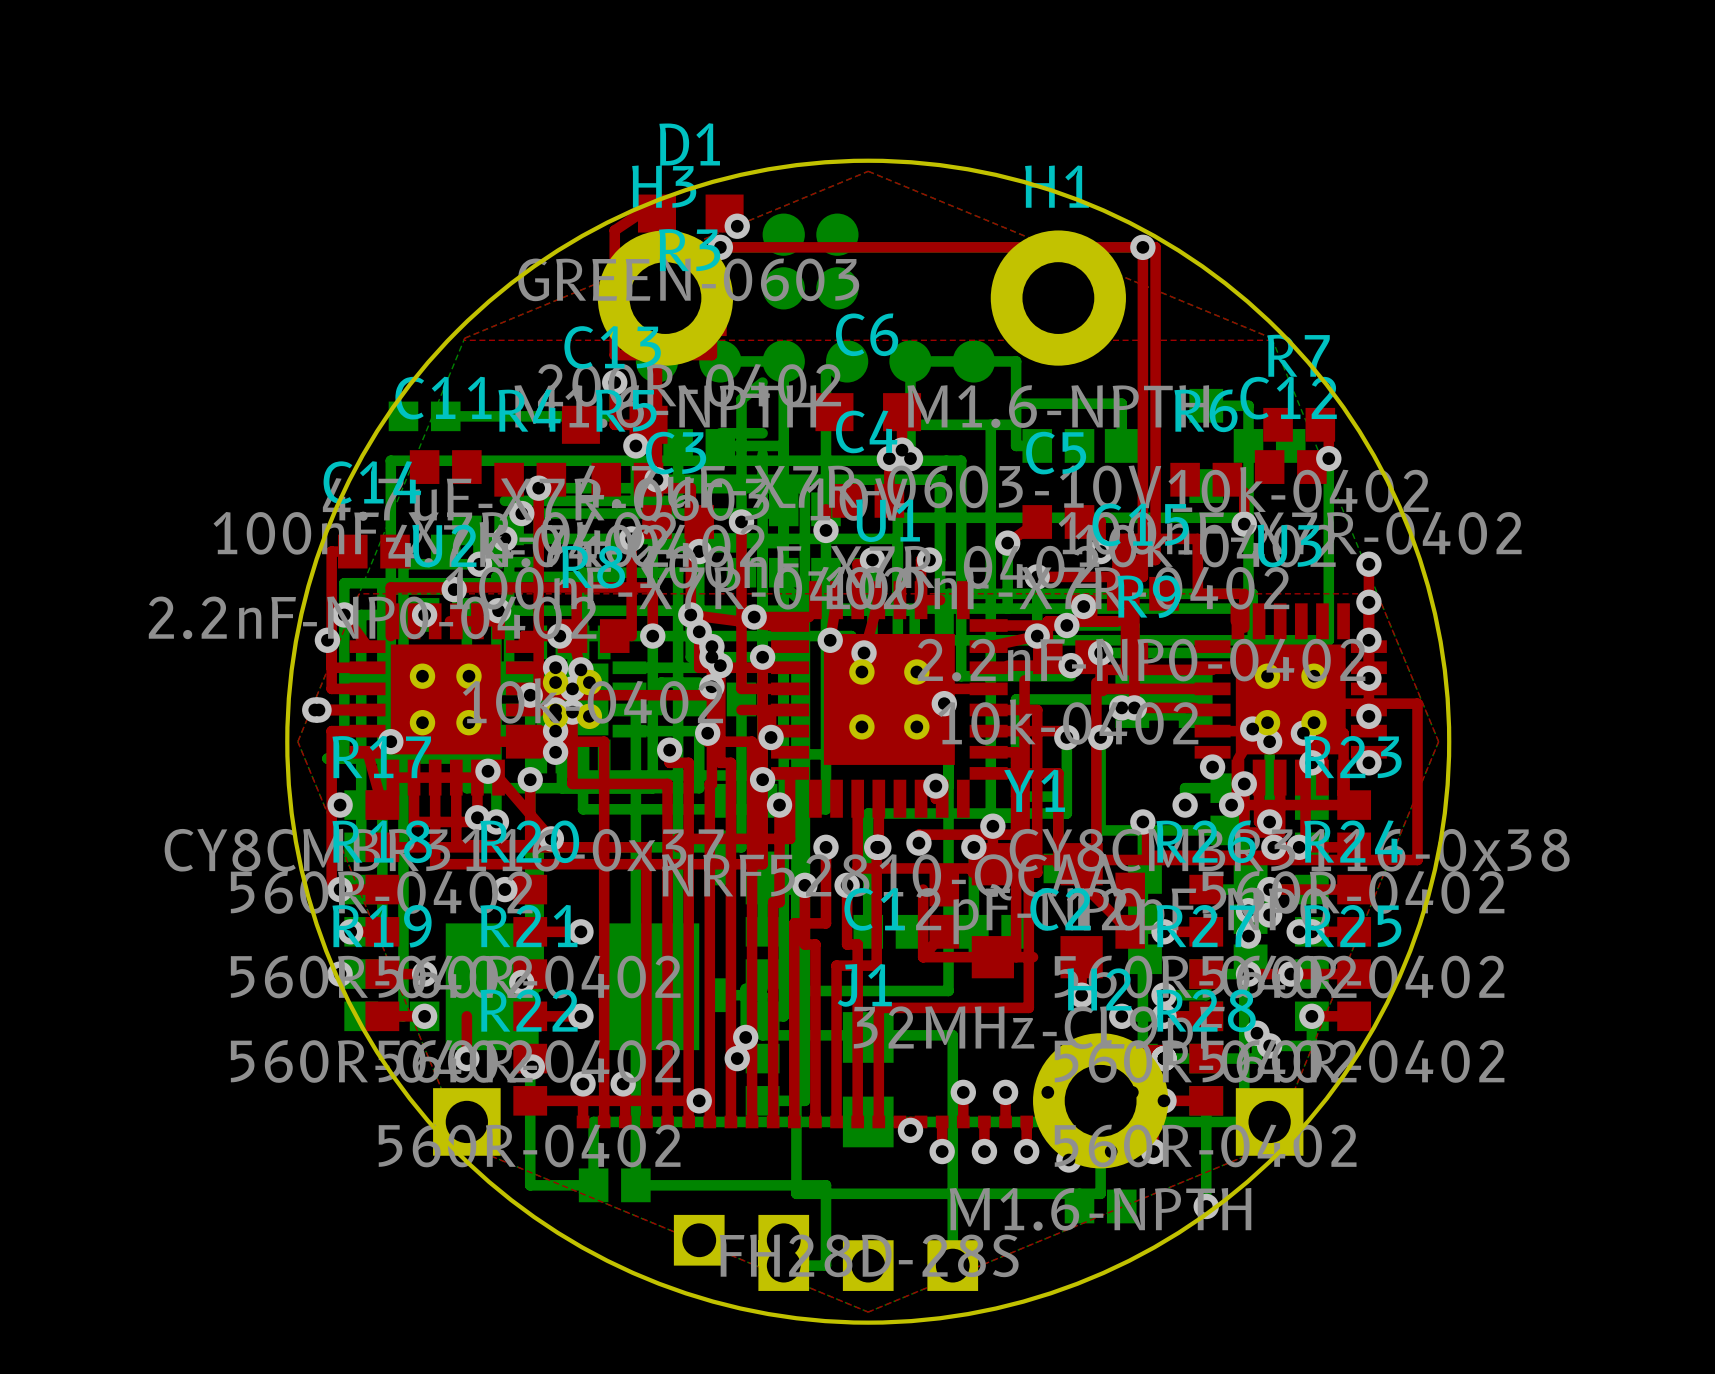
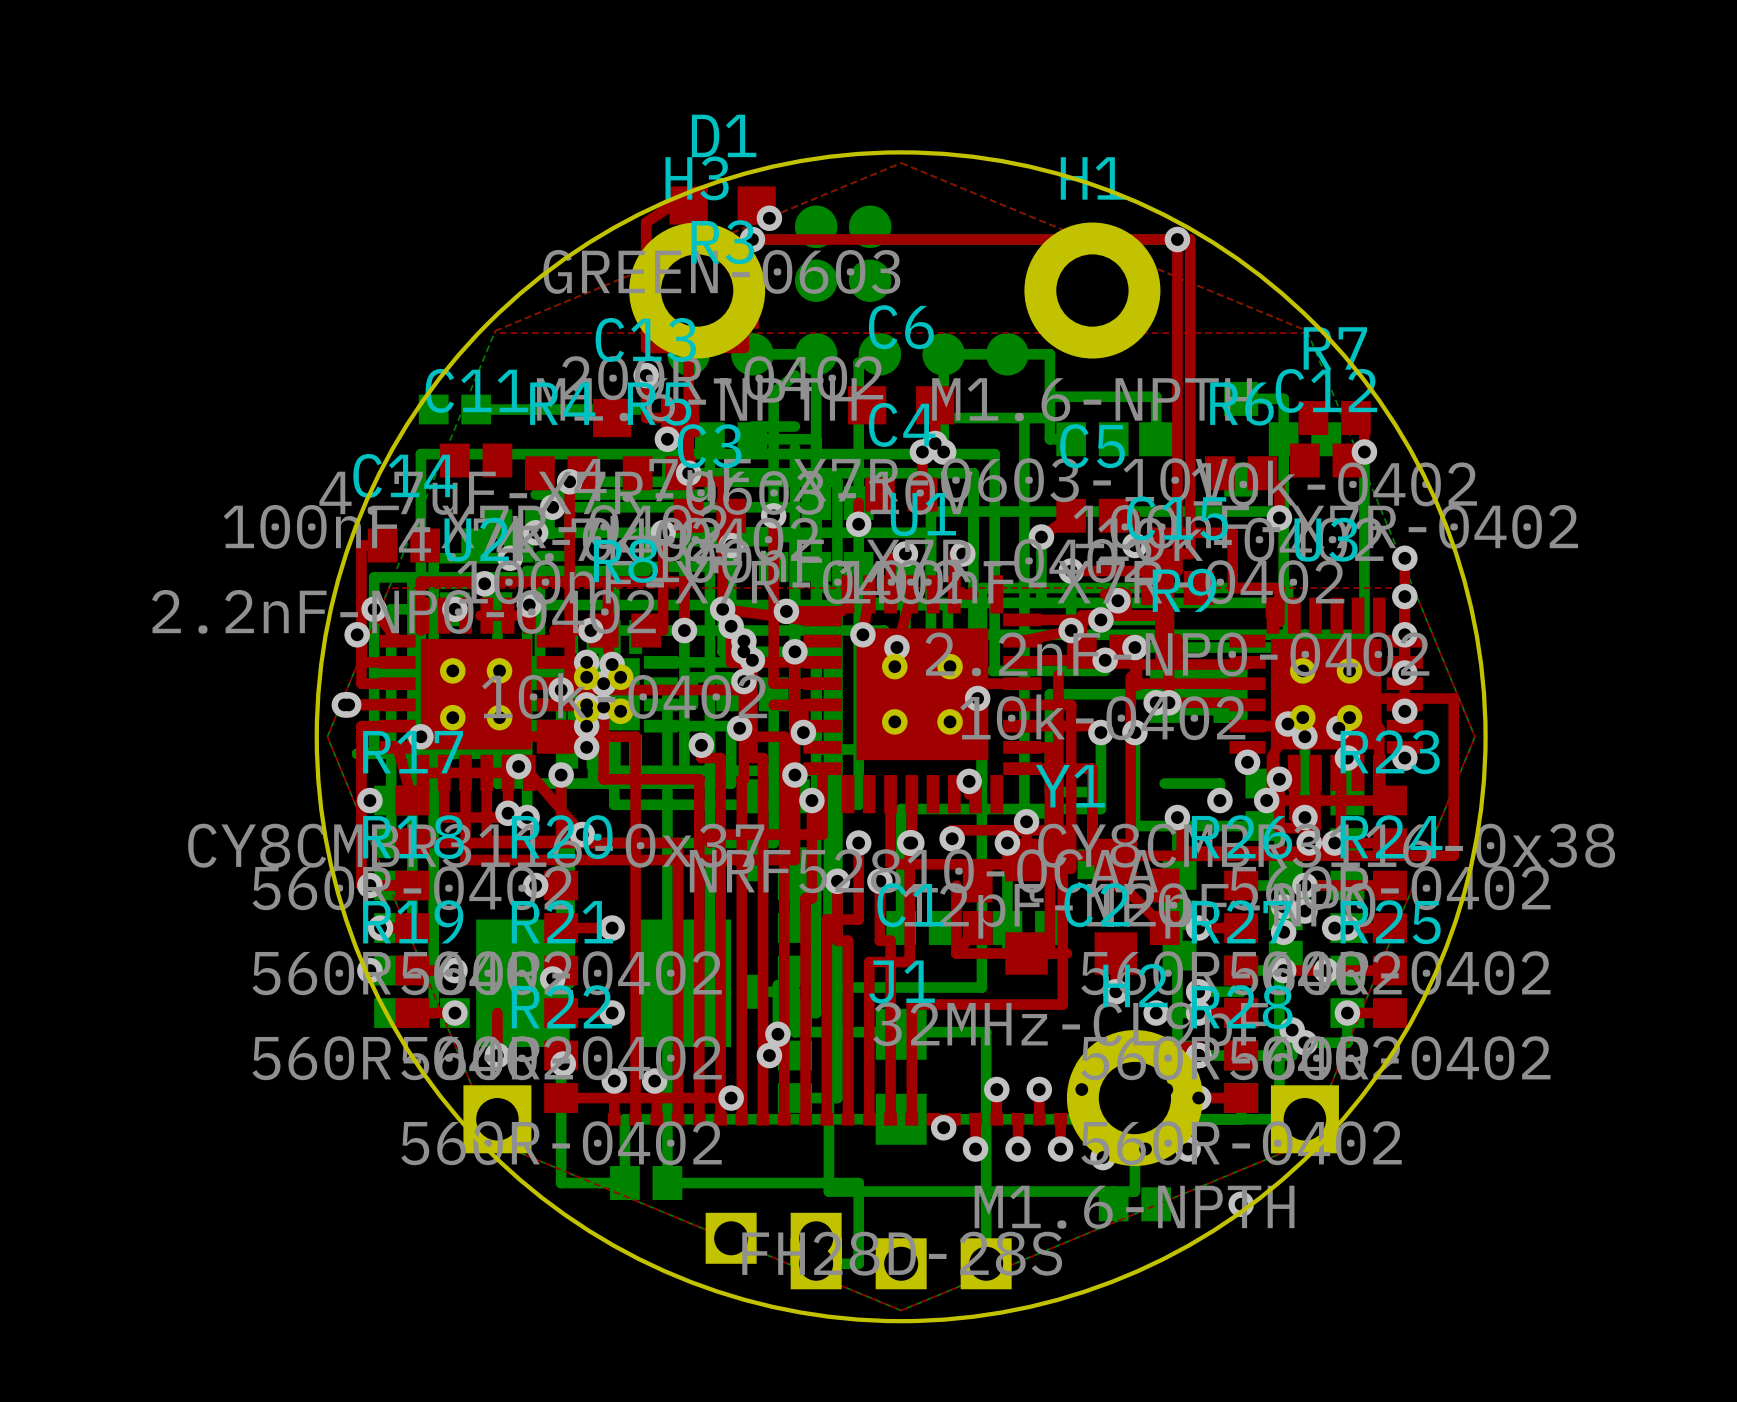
bottom track: (1185, 788) (1227, 788) -> (1219, 783) (1164, 783)
bottom track: (1206, 1121) (1206, 1206) -> none

